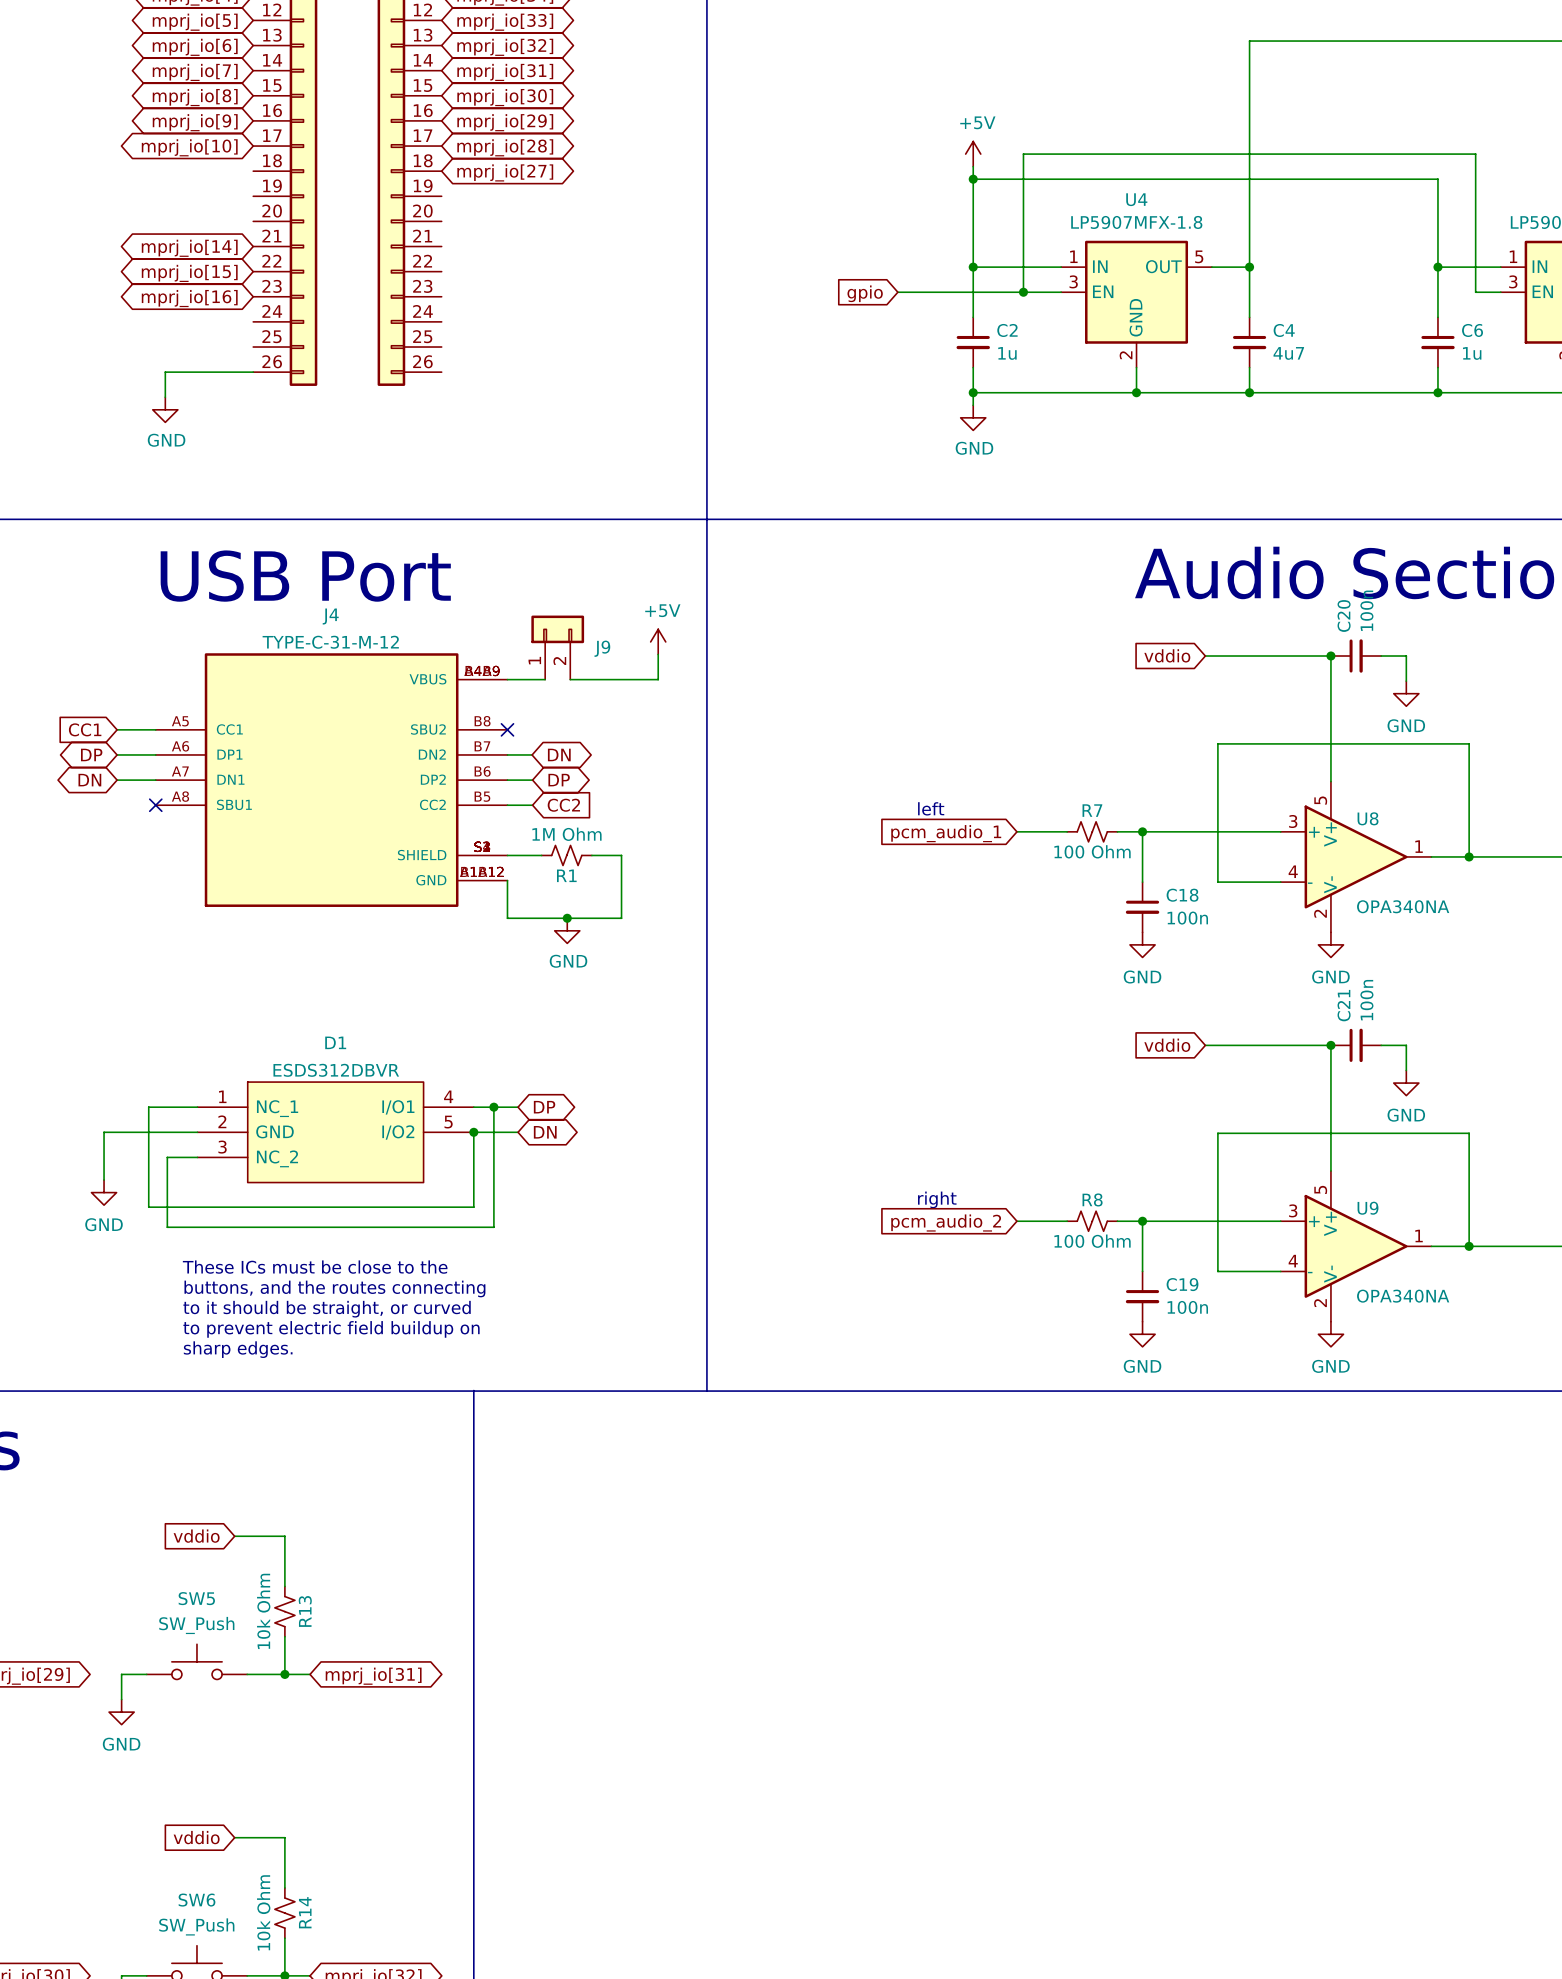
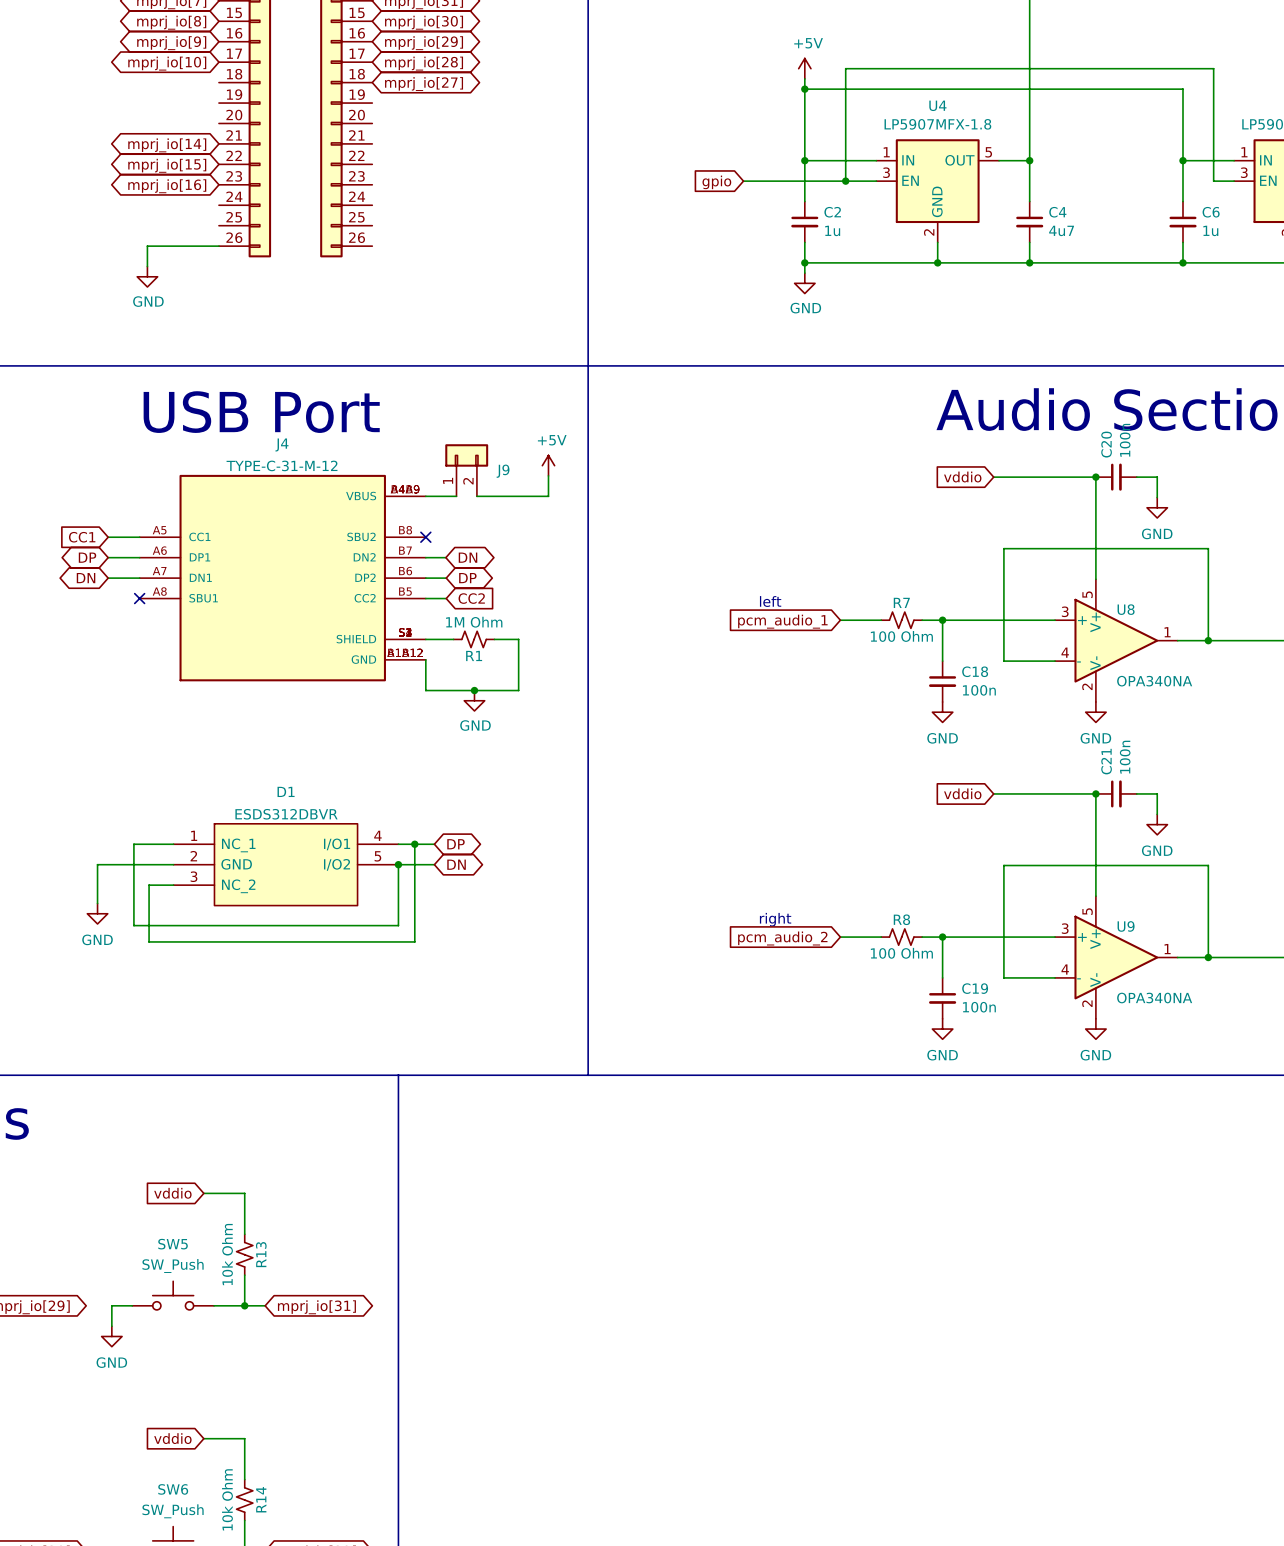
text: These ICs must be close to the (315, 1267) -> none
text: buttons, and the routes connecting (334, 1288) -> none
text: to it should be straight, or curved (327, 1309) -> none
text: to prevent electric field buildup on (331, 1329) -> none
text: sharp edges. (238, 1349) -> none

